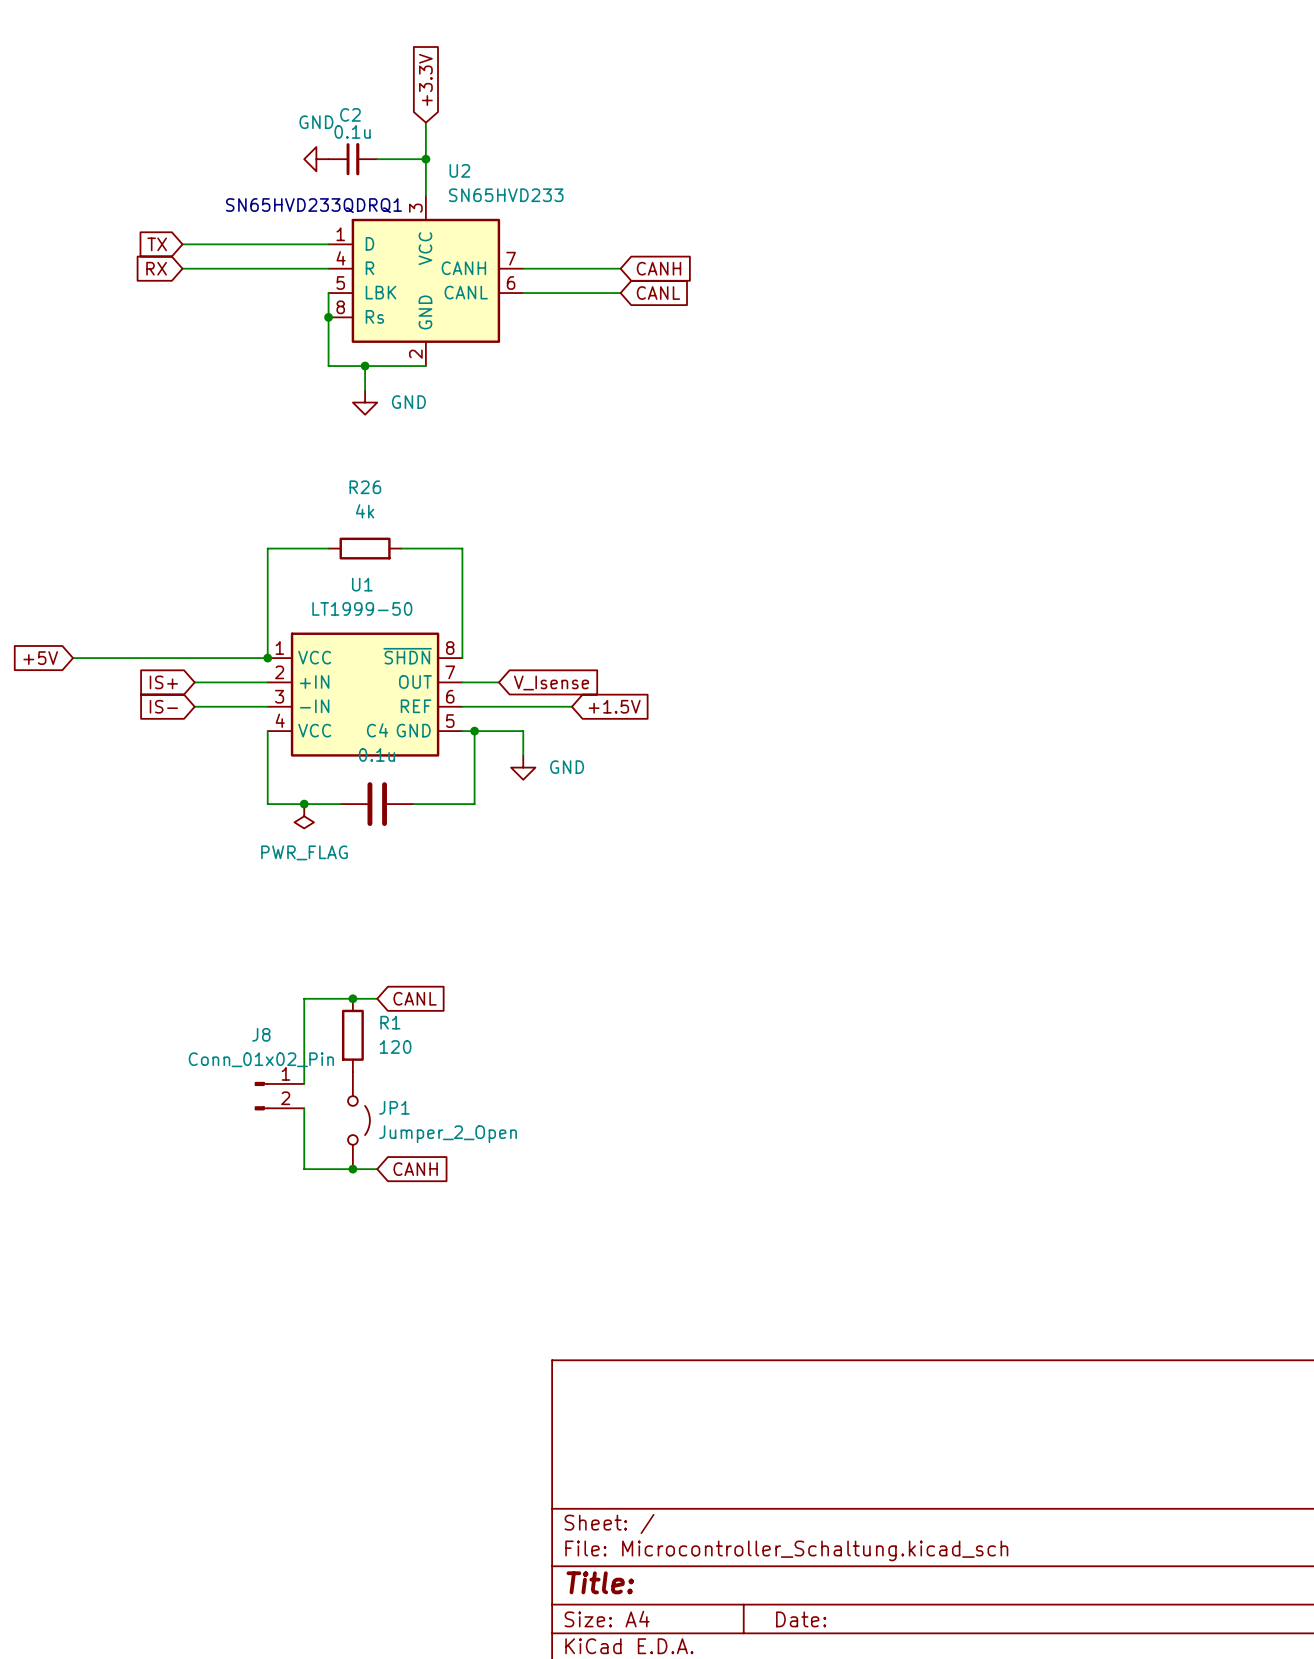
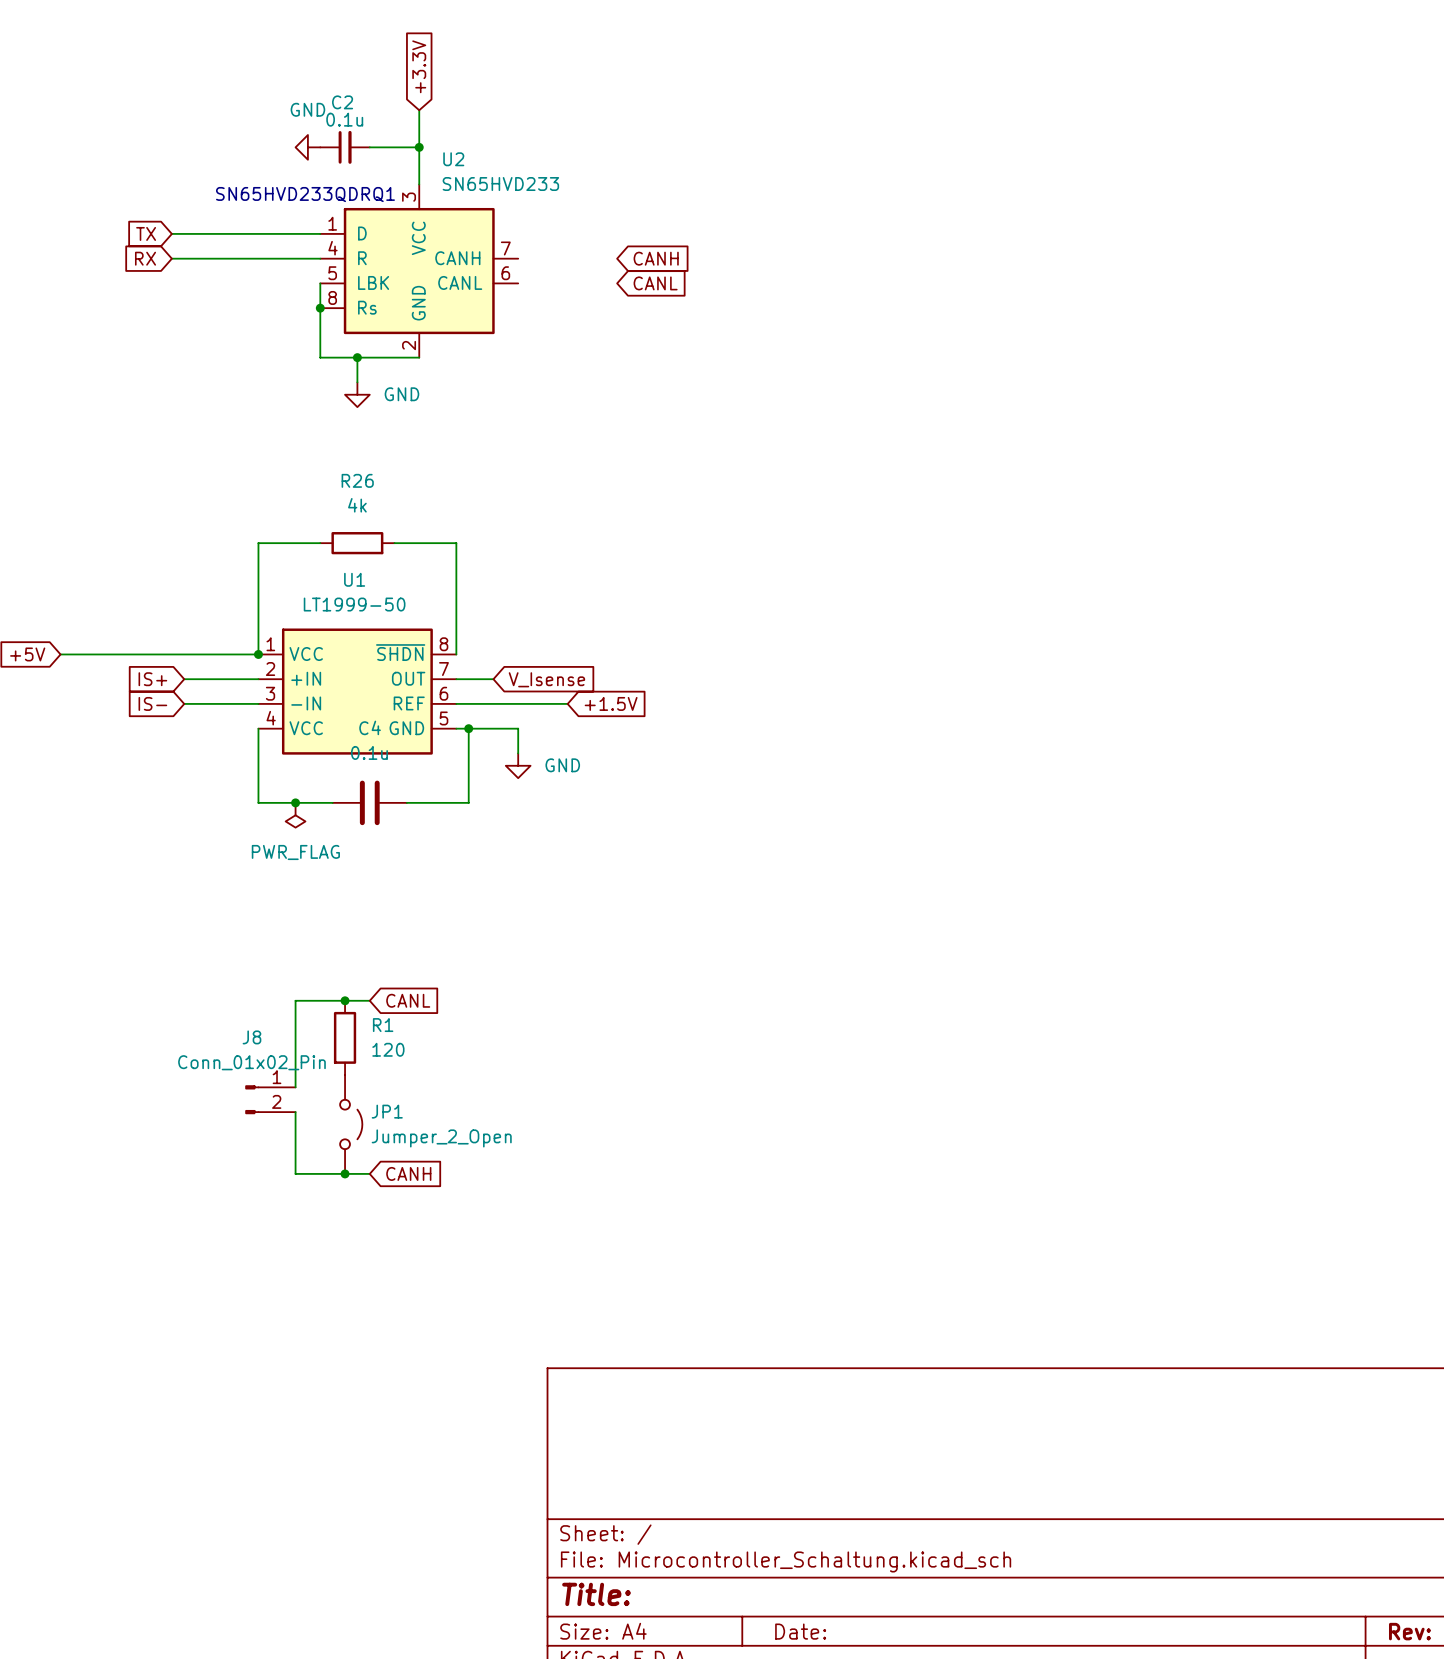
wire: (523, 268) (620, 268) -> none
wire: (523, 293) (620, 293) -> none

